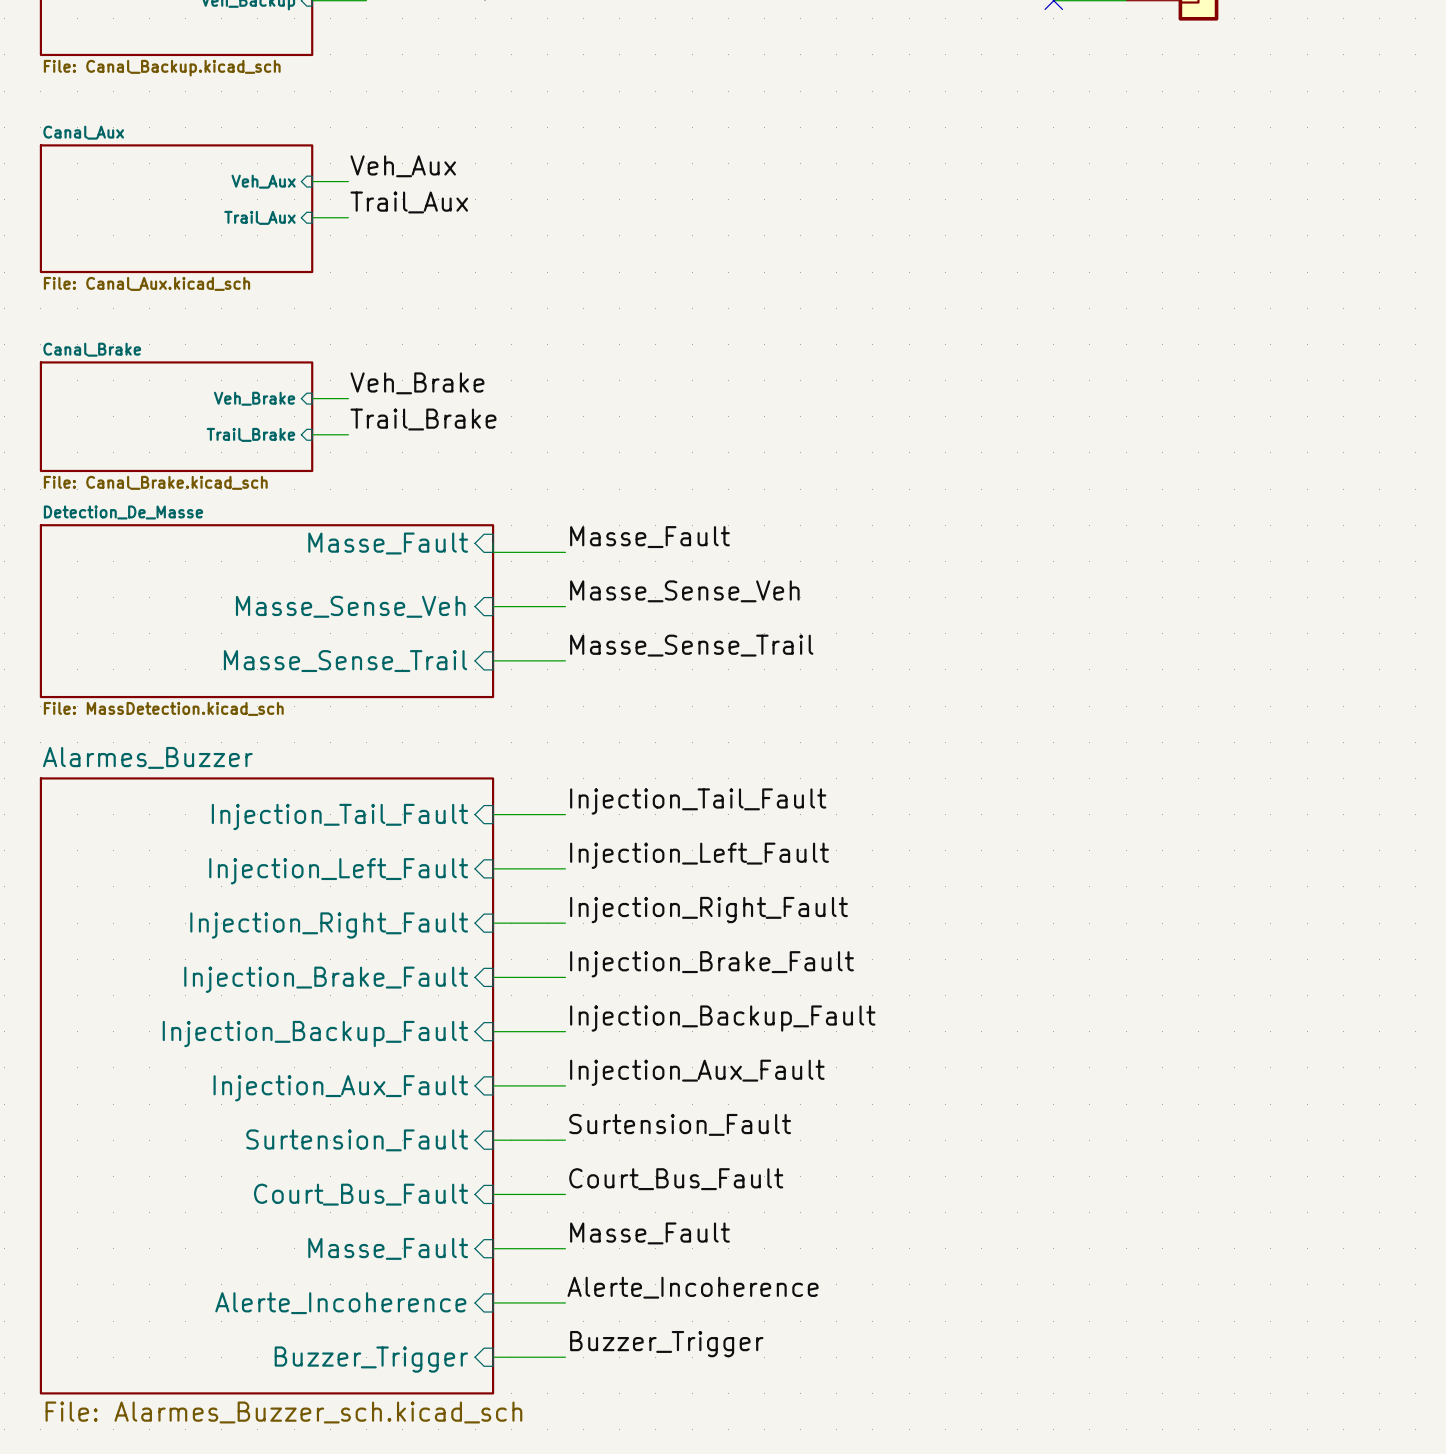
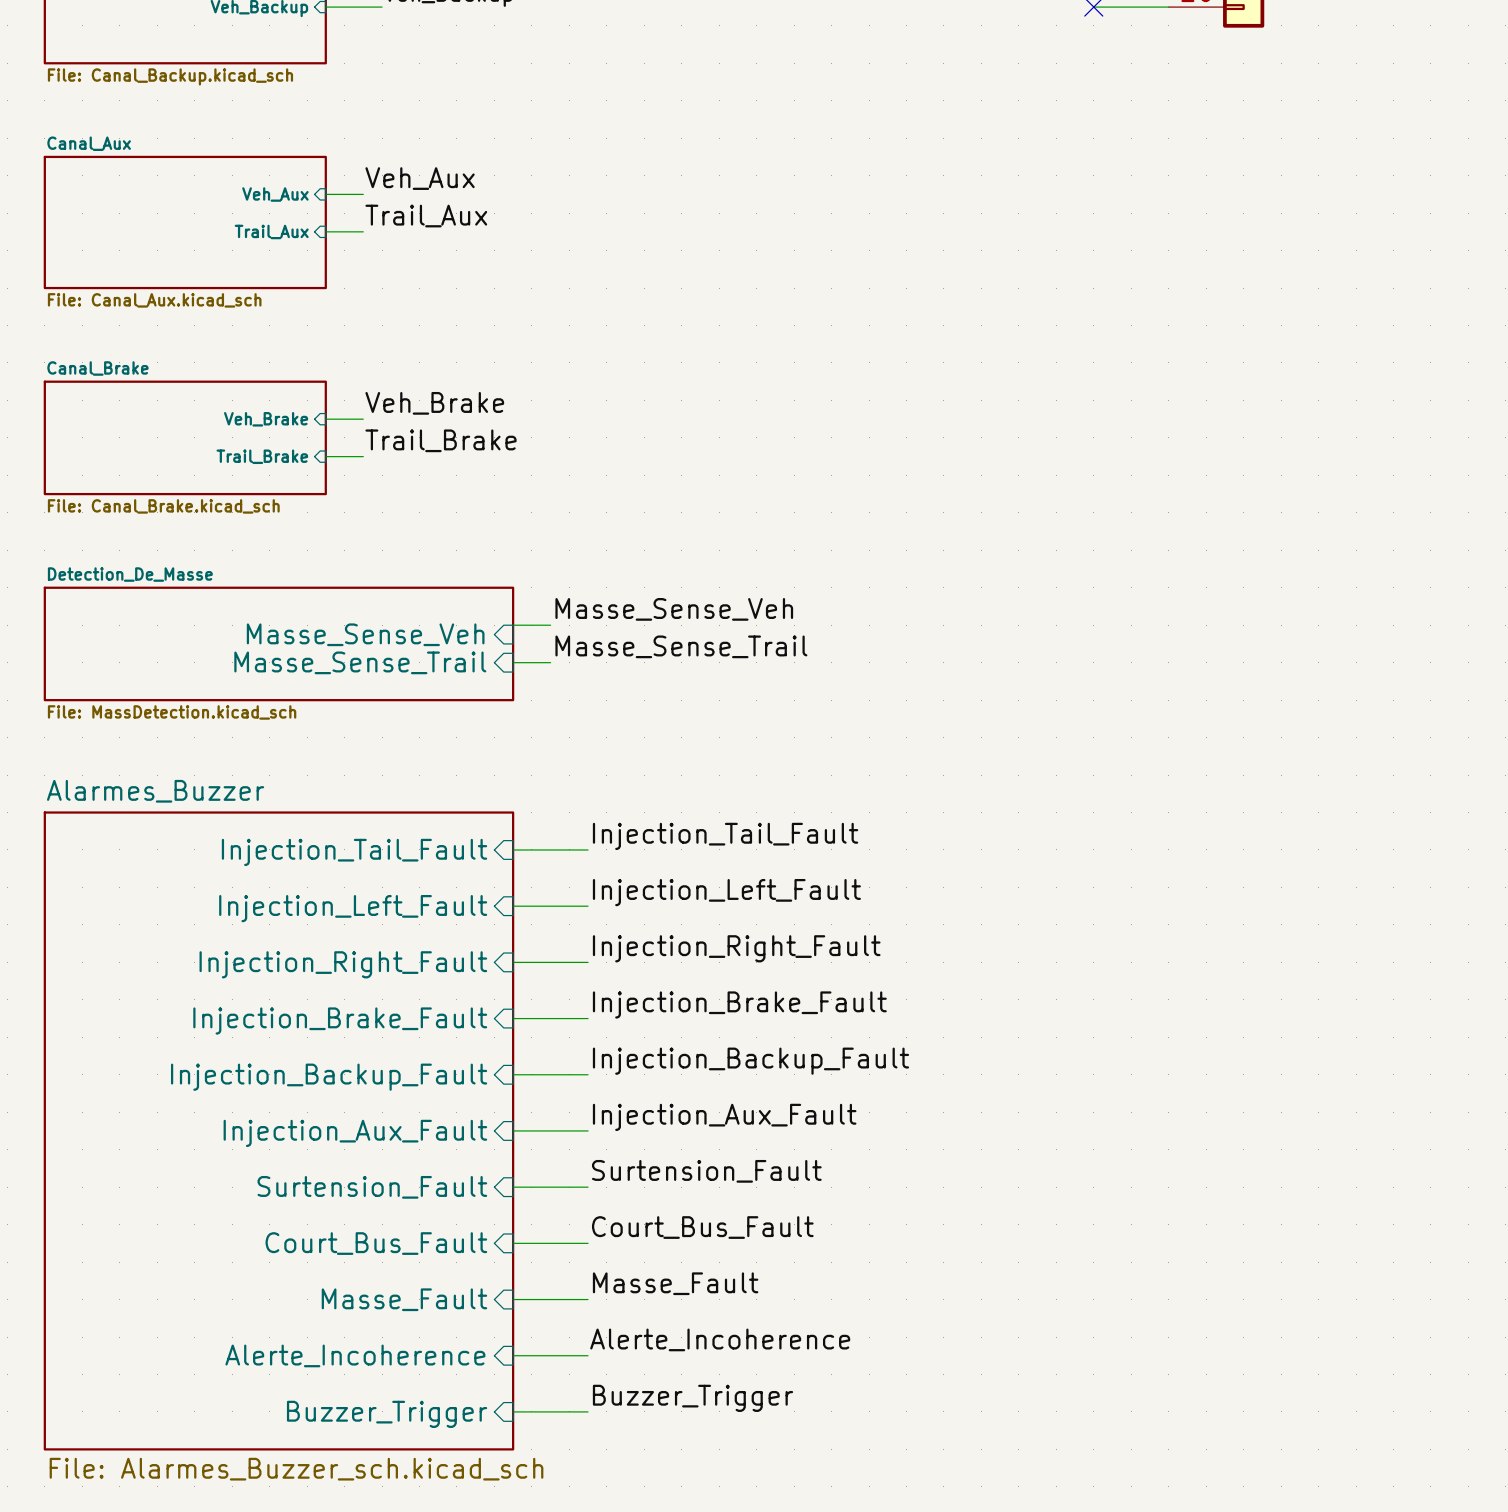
sheet Detection_De_Masse name position: Detection_De_Masse (123, 512) -> Detection_De_Masse (130, 574)
sheet Detection_De_Masse shape: [39, 524, 495, 699] -> [43, 586, 515, 702]
label: Masse_Fault (649, 537) -> none
sheet pin: Masse_Fault (388, 543) -> none
wire: (493, 543) (493, 552) (565, 552) -> none
label position: Masse_Sense_Veh (684, 591) -> Masse_Sense_Veh (674, 609)
wire: none -> (513, 625) (550, 625)
wire: (493, 606) (565, 606) -> none
wire: none -> (513, 662) (550, 662)
label position: Masse_Sense_Trail (691, 645) -> Masse_Sense_Trail (681, 646)
wire: (493, 660) (565, 660) -> none
sheet pin position: Masse_Sense_Trail (345, 661) -> Masse_Sense_Trail (360, 662)
sheet Detection_De_Masse value position: File: MassDetection.kicad_sch (163, 708) -> File: MassDetection.kicad_sch (172, 712)

